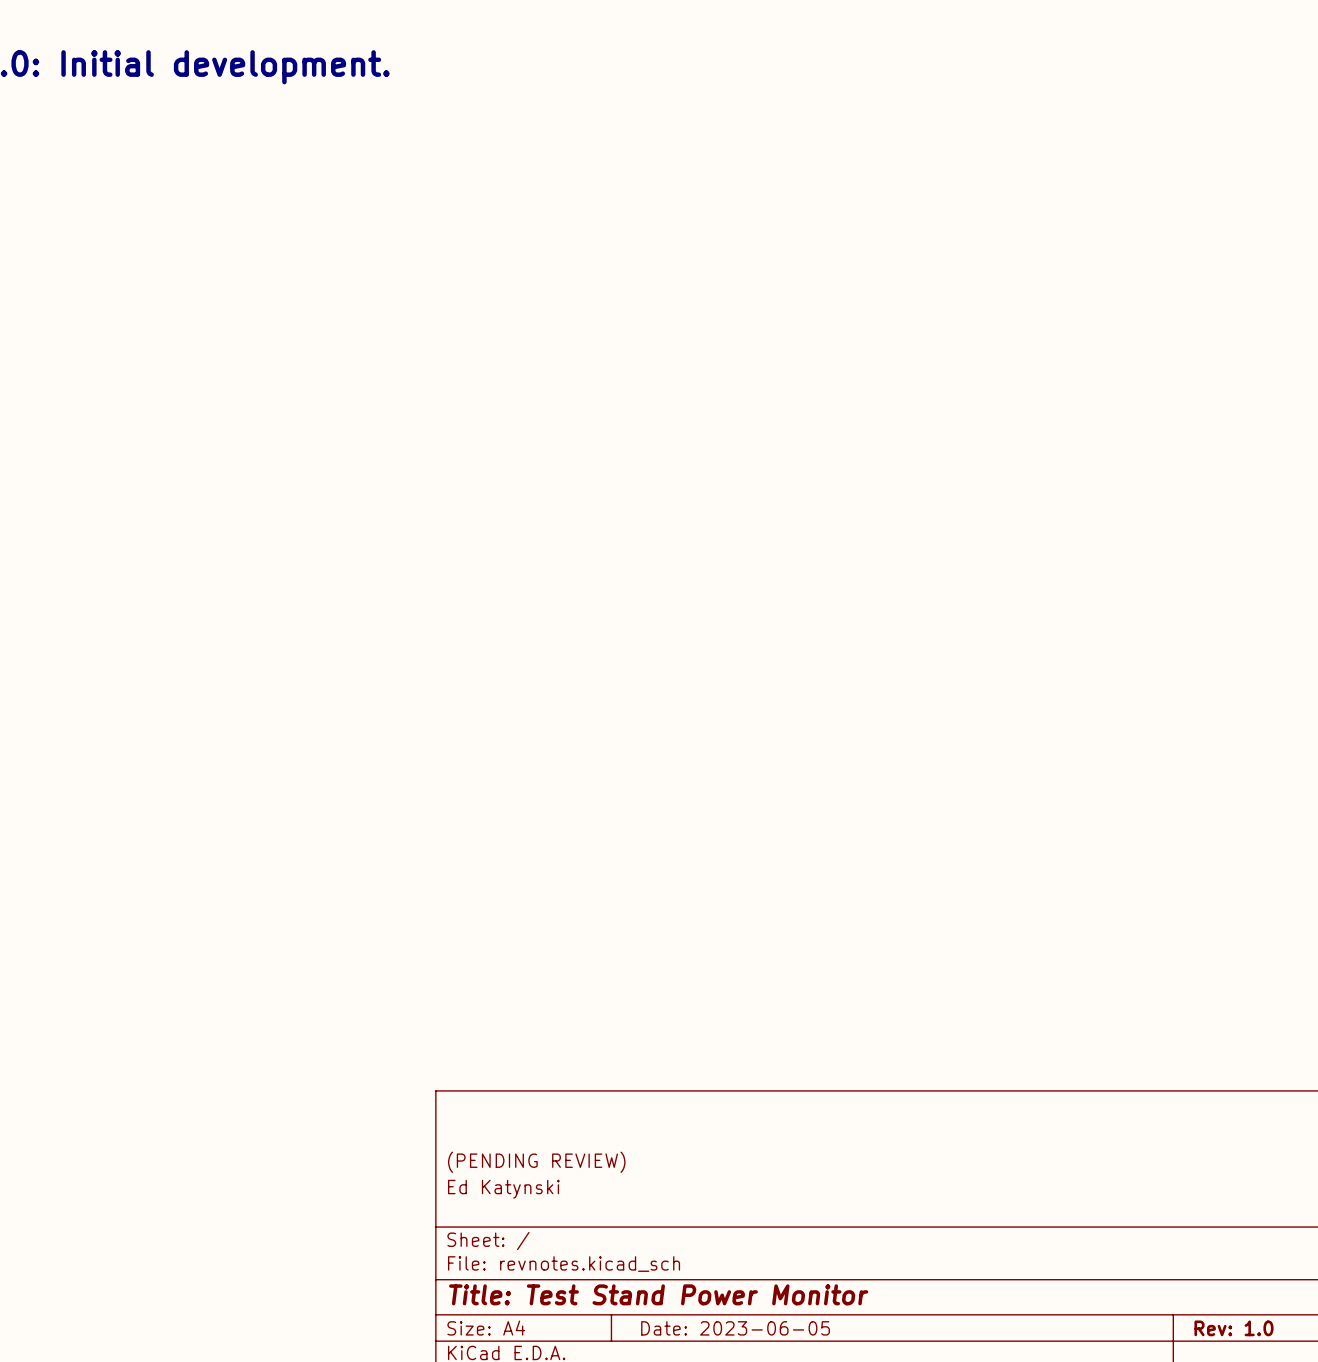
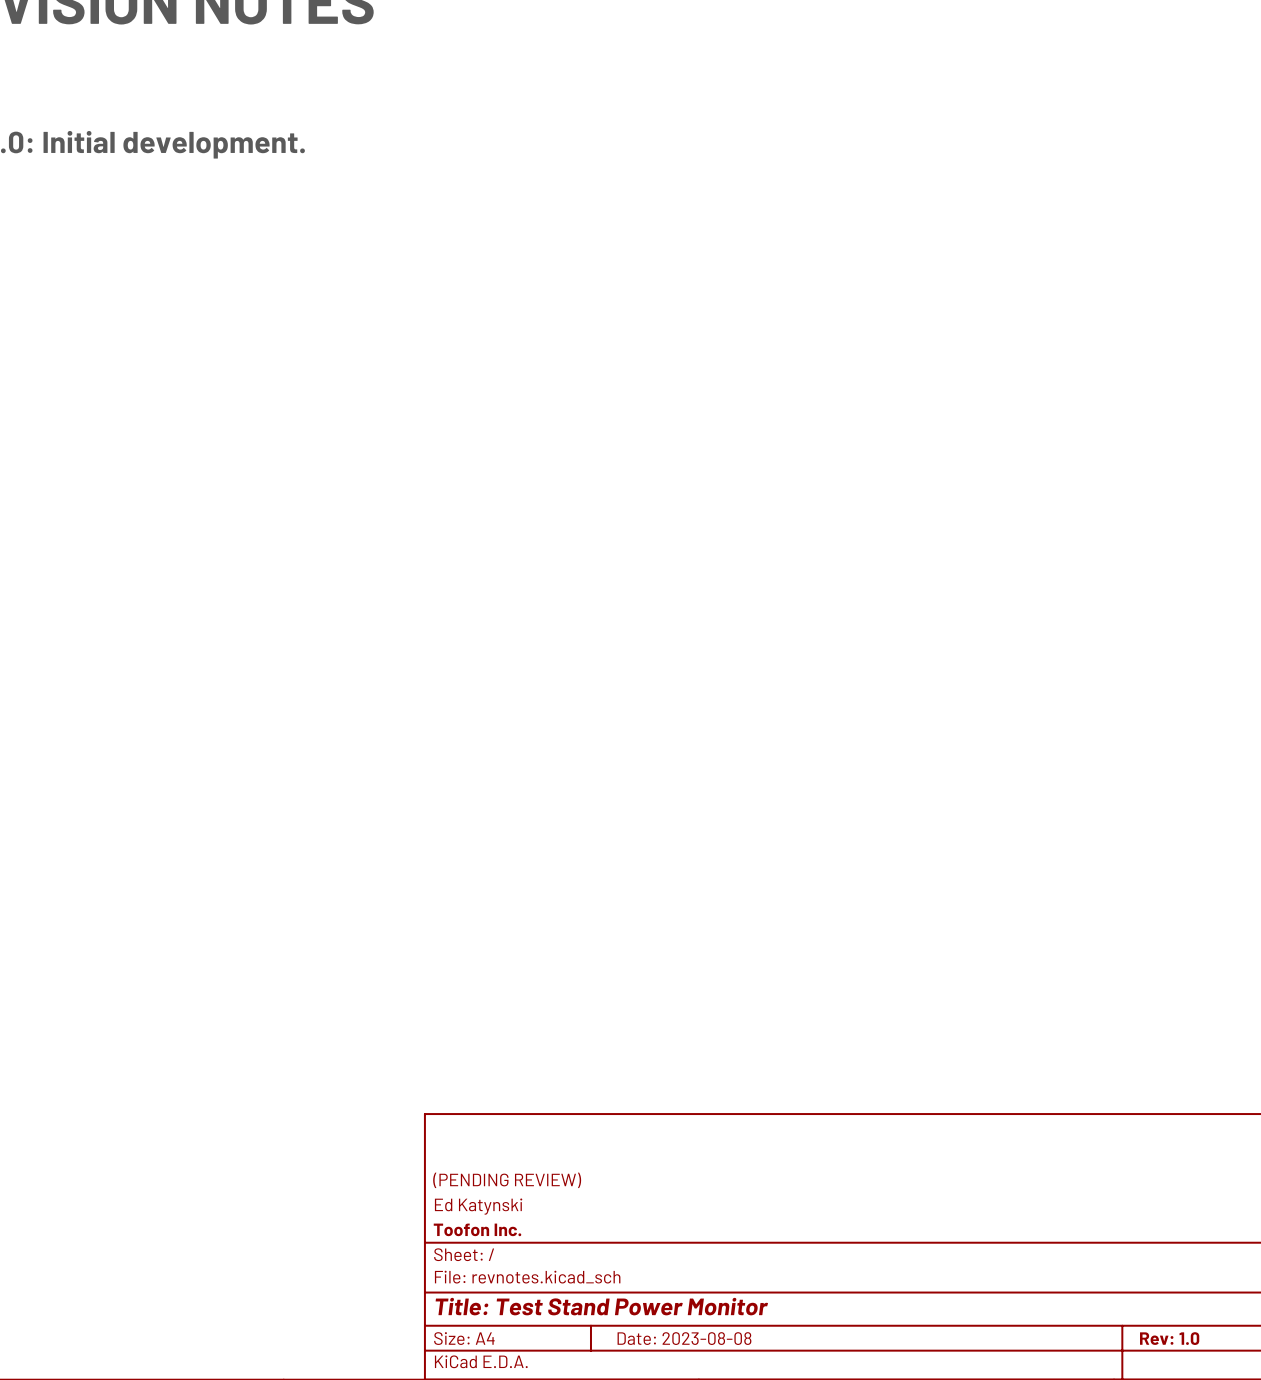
title block: none -> Toofon Inc. (477, 1229)
title block: Date: 2023-06-05 (735, 1328) -> Date: 2023-08-08 (684, 1338)

